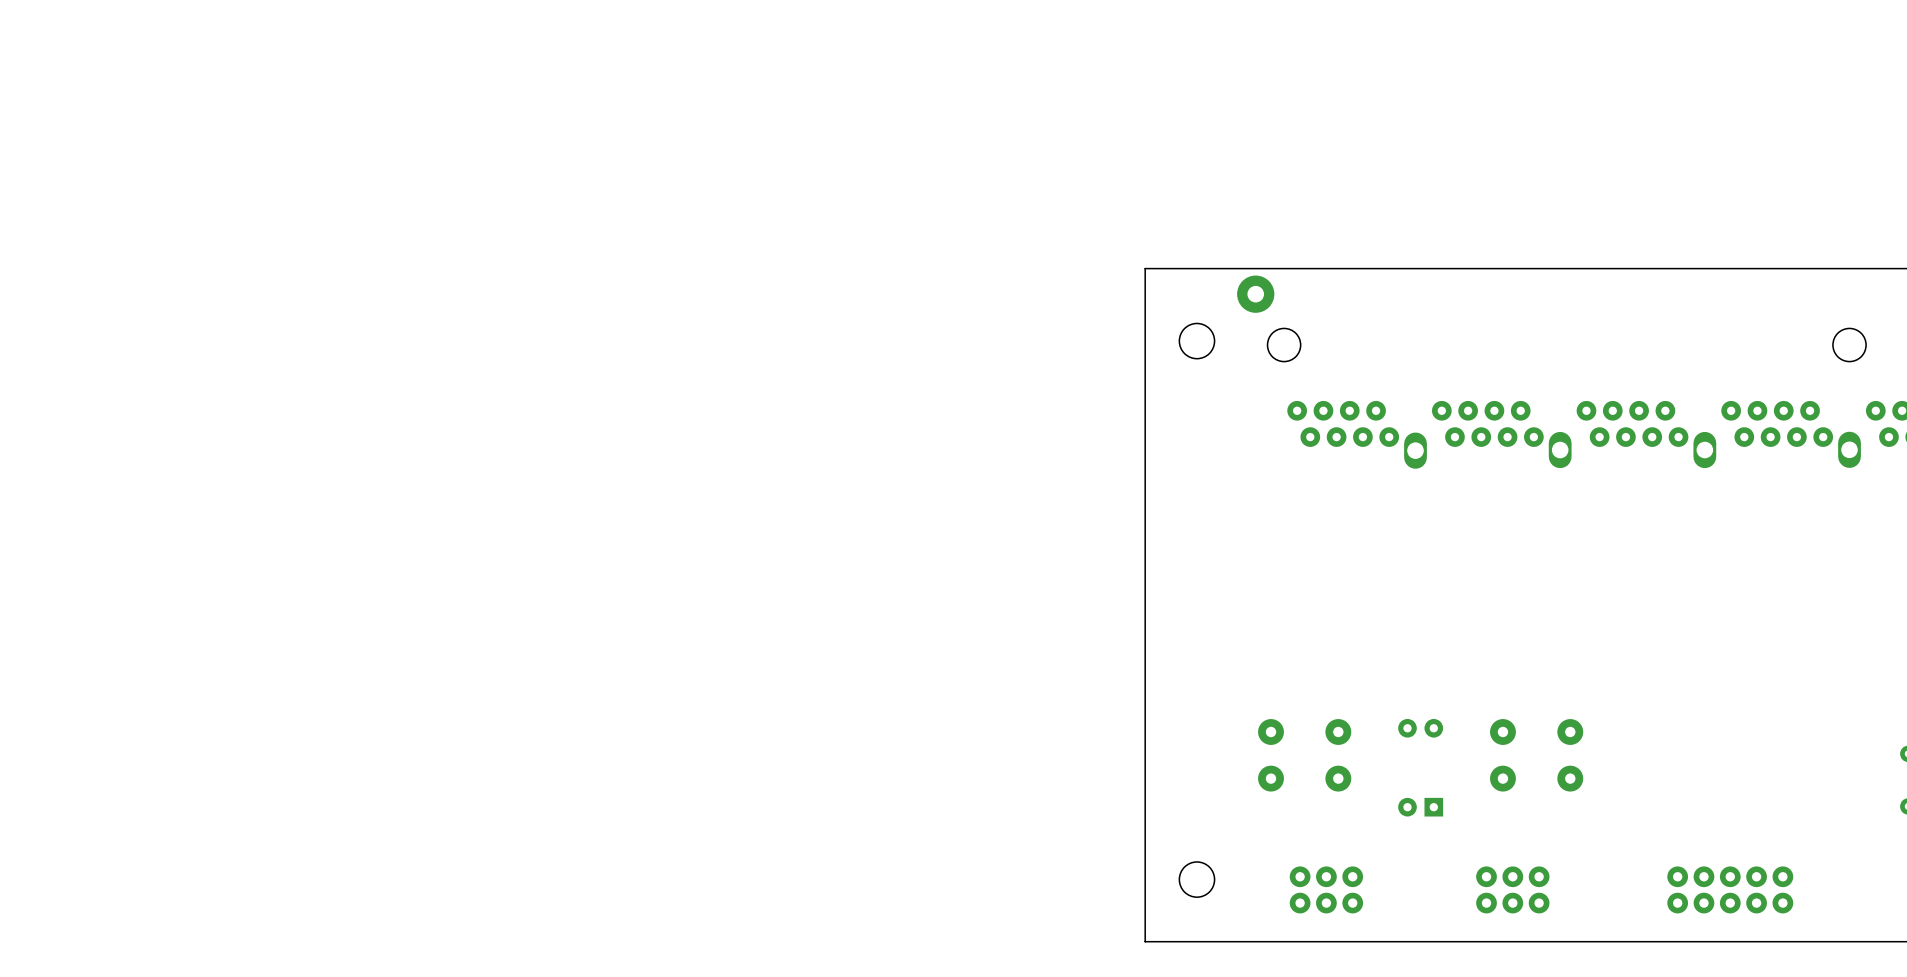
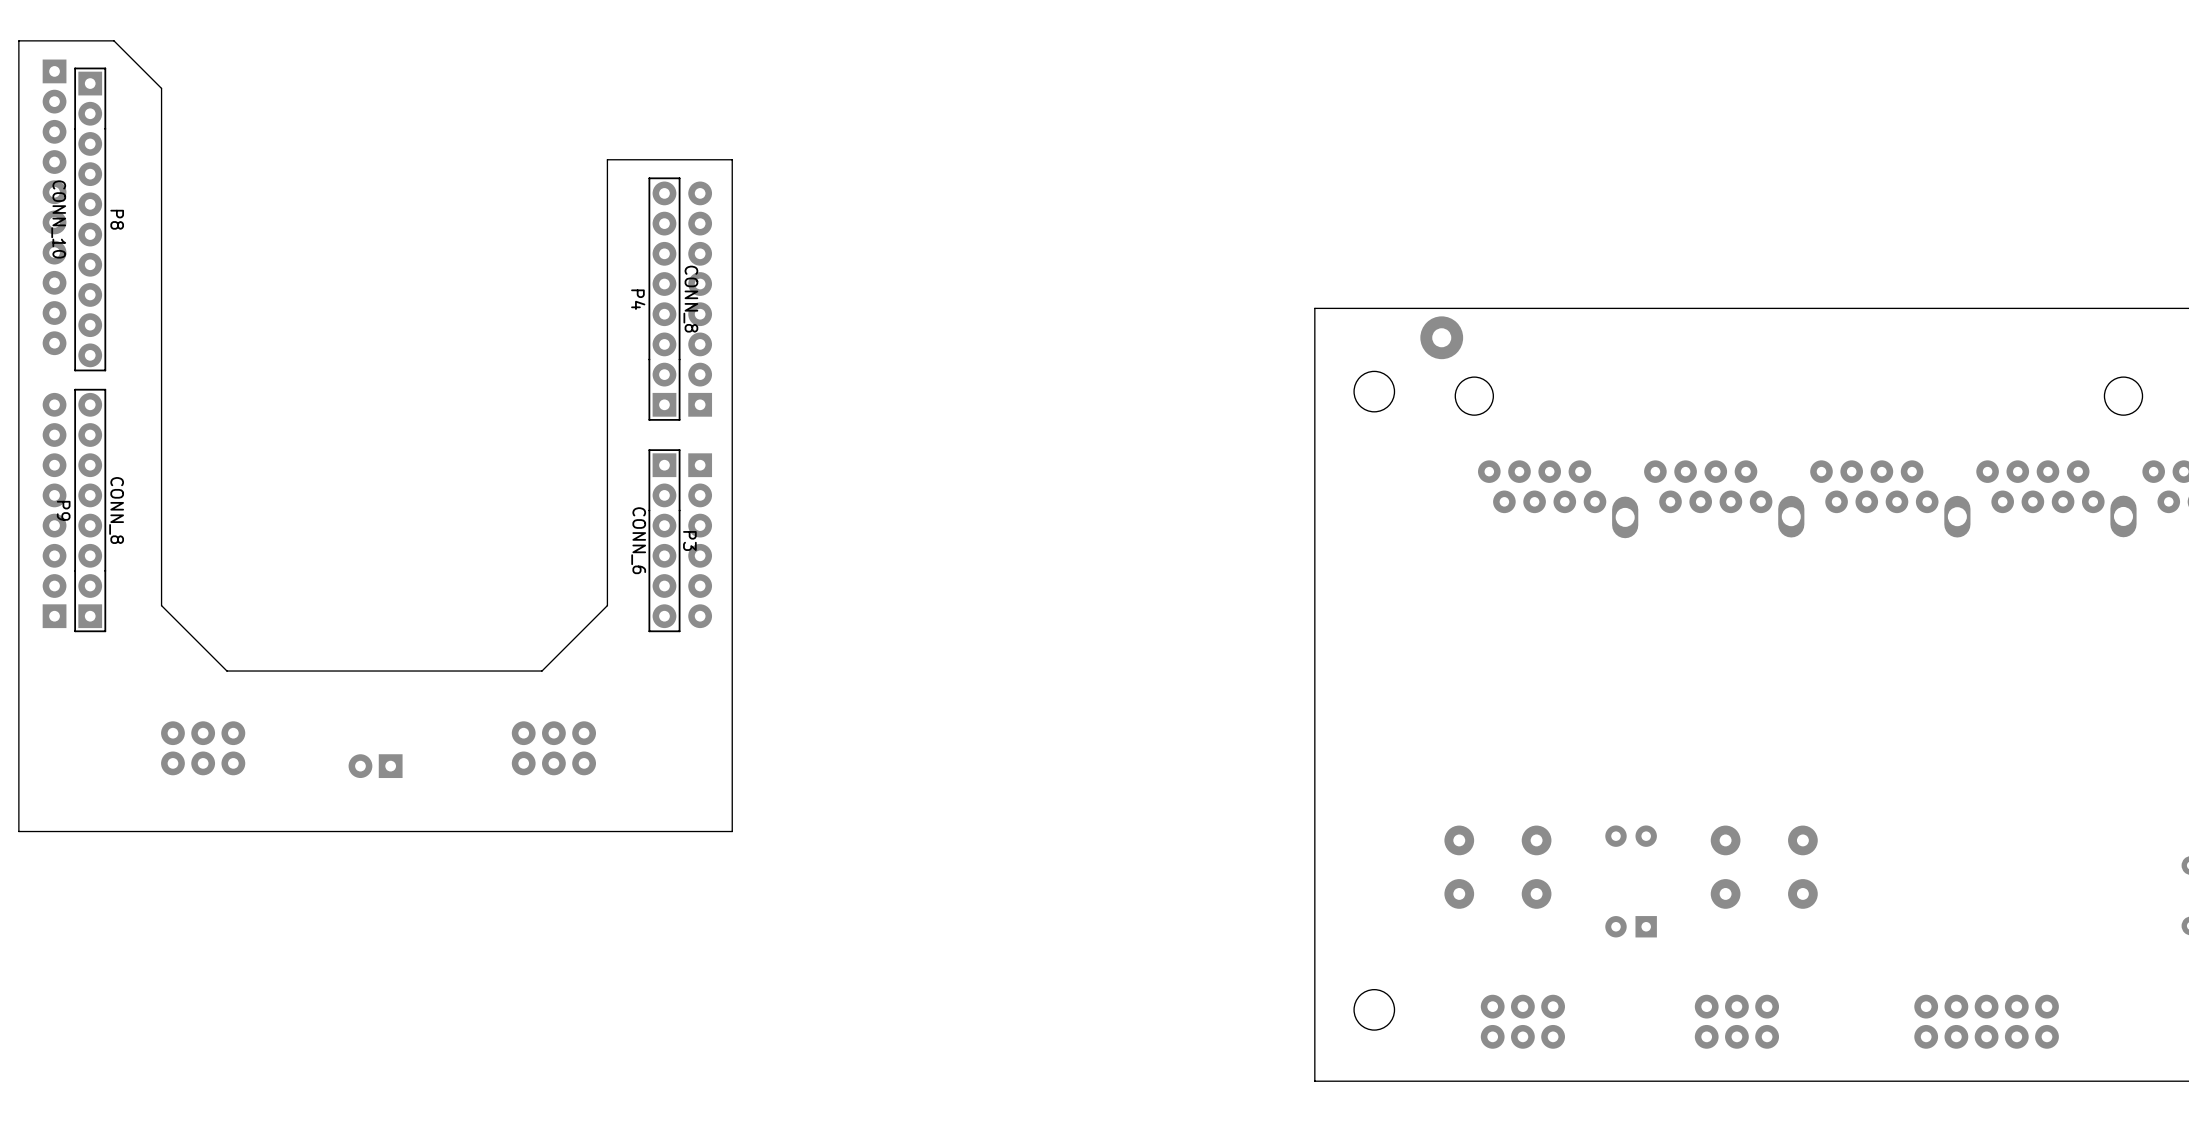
board edge: none -> (113, 40) (18, 40) (18, 831) (732, 831) (732, 159) (607, 159) (607, 605) (542, 671) (226, 671) (161, 605) (161, 88) (113, 40)
part: none -> (54, 207)
P8: none -> CONN_10 (90, 219)
P4: none -> CONN_8 (664, 299)
part: none -> (700, 299)
part: none -> (54, 510)
P9: none -> CONN_8 (90, 510)
P3: none -> CONN_6 (664, 540)
part: none -> (700, 540)
part: none -> (203, 748)
part: none -> (553, 748)
part: none -> (375, 766)

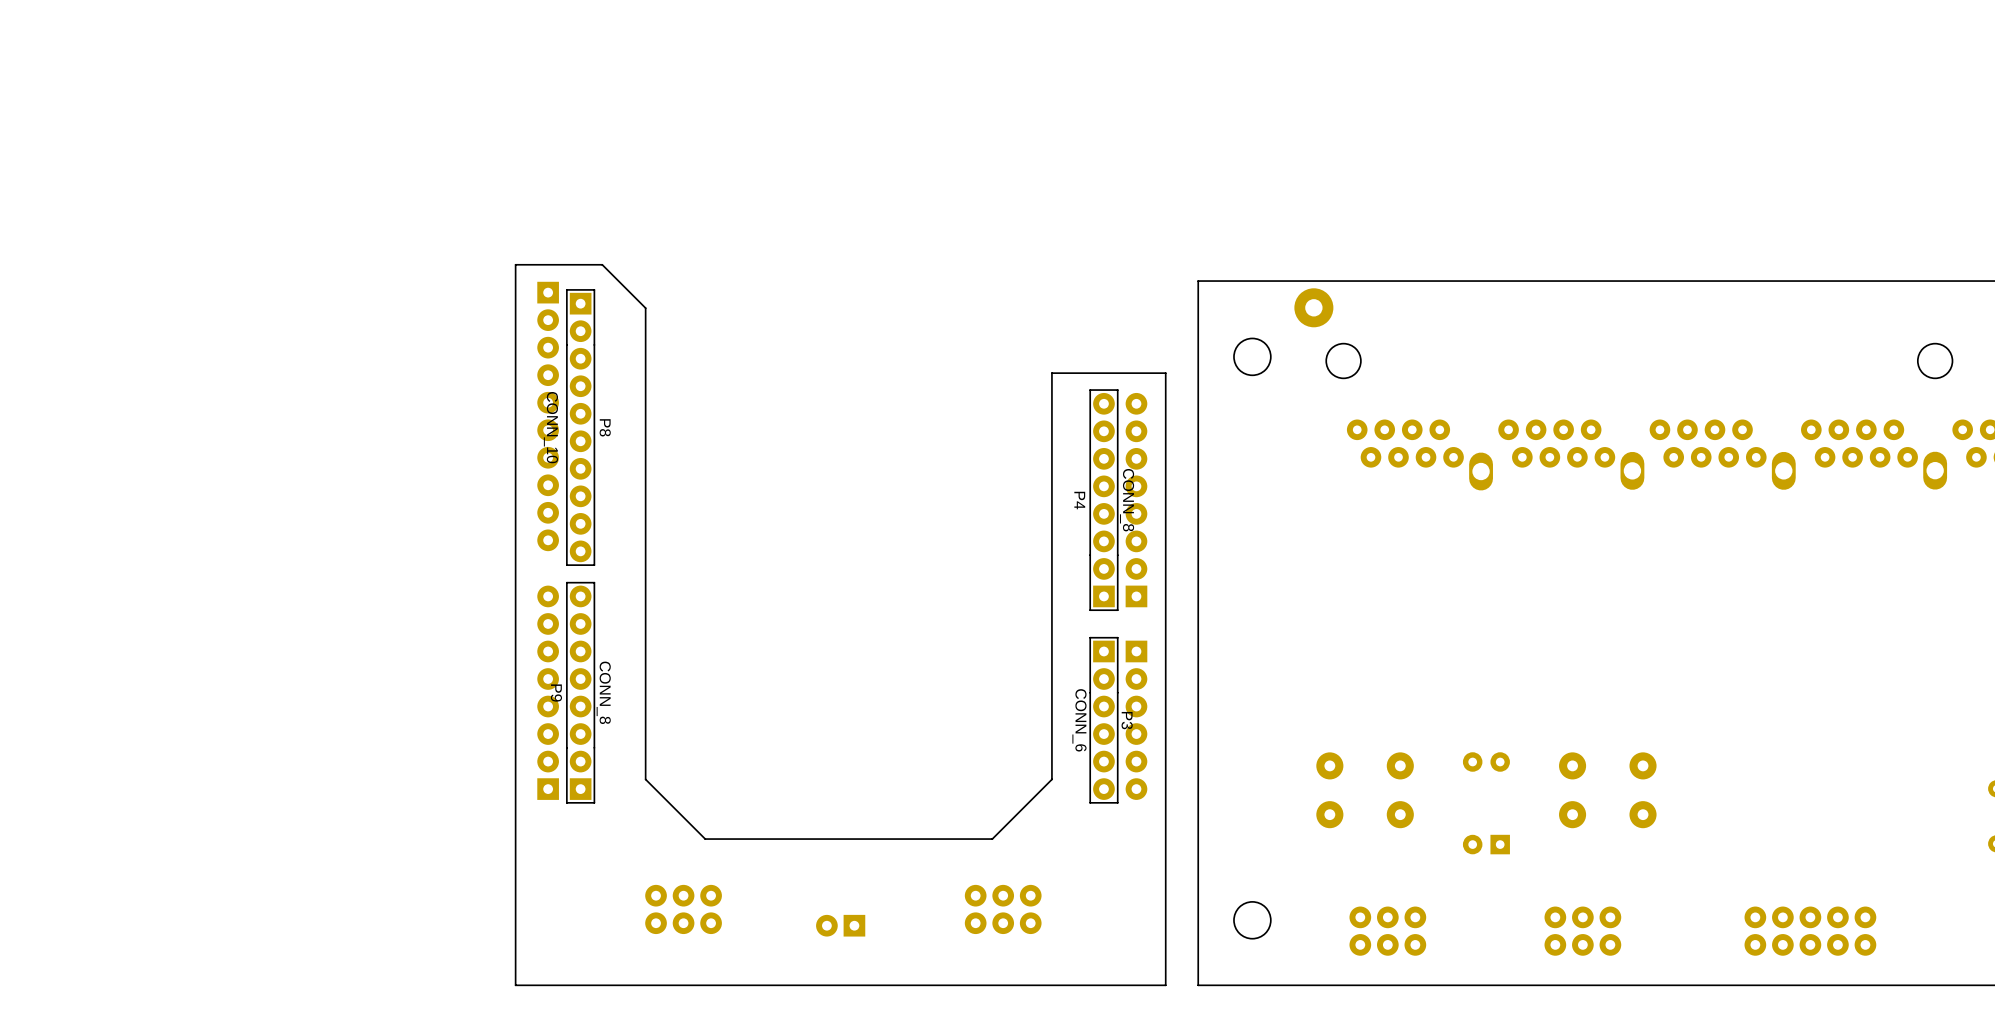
board edge: (113, 40) (18, 40) (18, 831) (732, 831) (732, 159) (607, 159) (607, 605) (542, 671) (226, 671) (161, 605) (161, 88) (113, 40) -> none
part: (54, 207) -> none
P8 position: (90, 219) -> (580, 427)
board edge: none -> (602, 264) (515, 264) (515, 985) (1165, 985) (1165, 373) (1051, 373) (1051, 779) (992, 839) (705, 839) (645, 779) (645, 308) (602, 264)
P4 position: (664, 299) -> (1103, 500)
part: (700, 299) -> none
part: none -> (548, 416)
part: (54, 510) -> none
P9 position: (90, 510) -> (580, 692)
P3 position: (664, 540) -> (1103, 720)
part: (700, 540) -> none
part: none -> (1136, 500)
part: (203, 748) -> none
part: (553, 748) -> none
part: none -> (548, 692)
part: (375, 766) -> none
part: none -> (1136, 720)
part: none -> (683, 909)
part: none -> (1003, 909)
part: none -> (840, 925)

